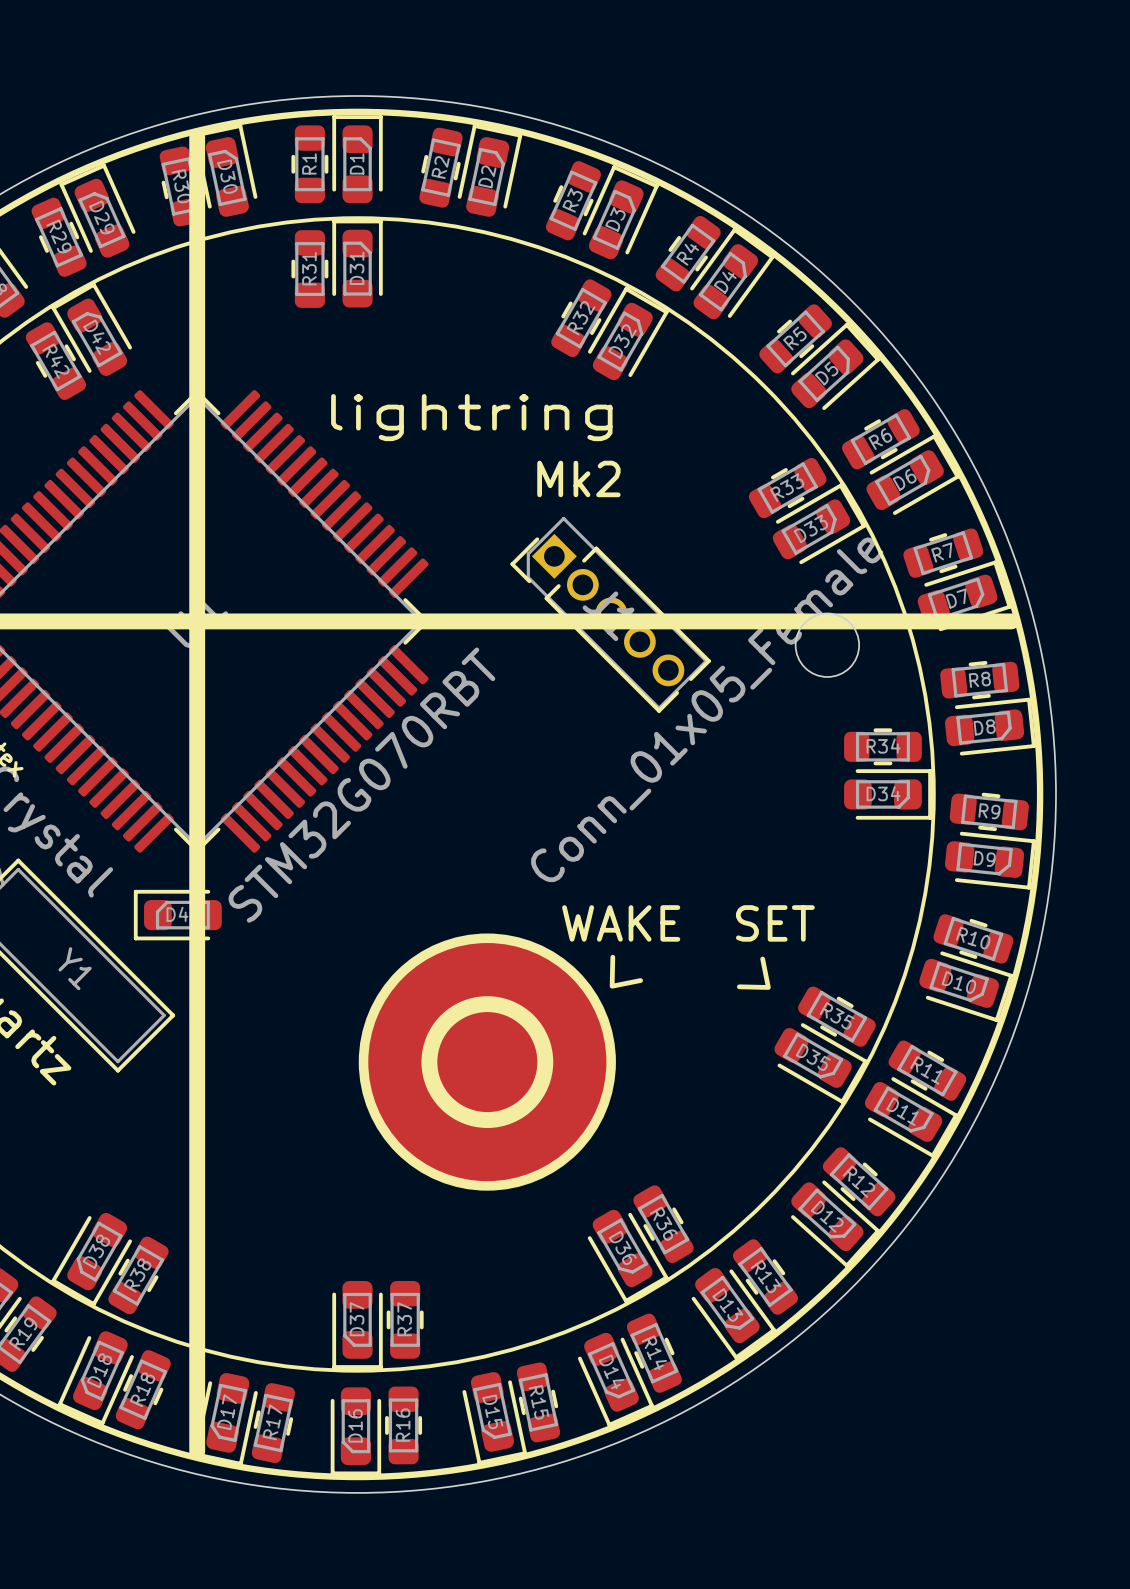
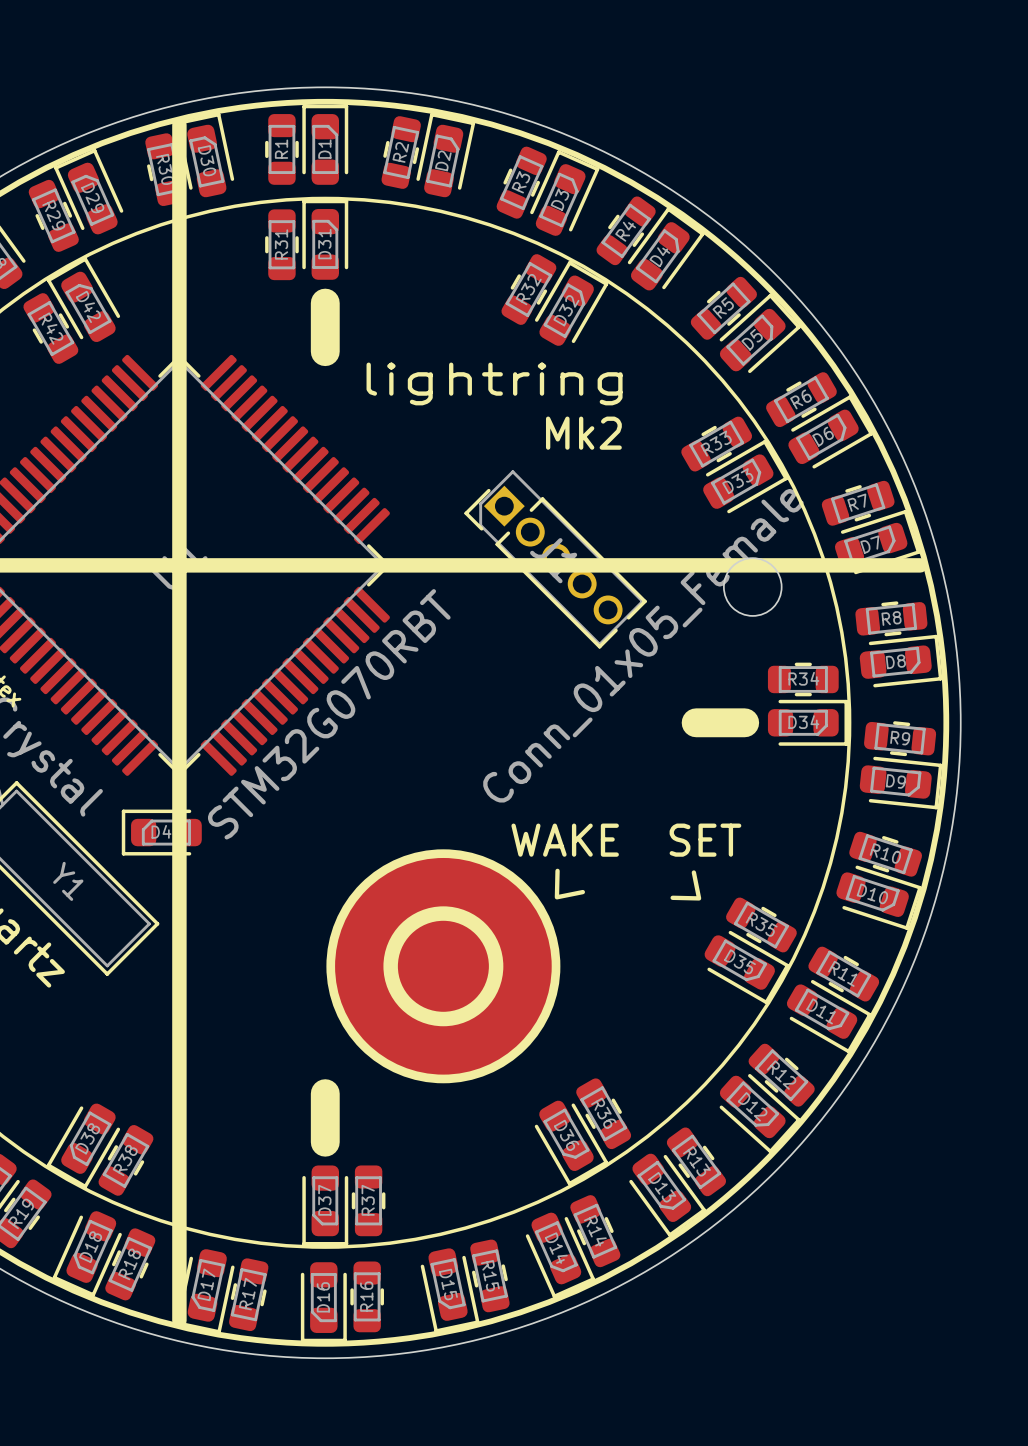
line: none -> (325, 303) (325, 351)
text position: lightring (471, 417) -> lightring (494, 383)
text position: Mk2 (578, 478) -> Mk2 (583, 433)
line: none -> (696, 722) (744, 722)
line: none -> (325, 1093) (325, 1142)

